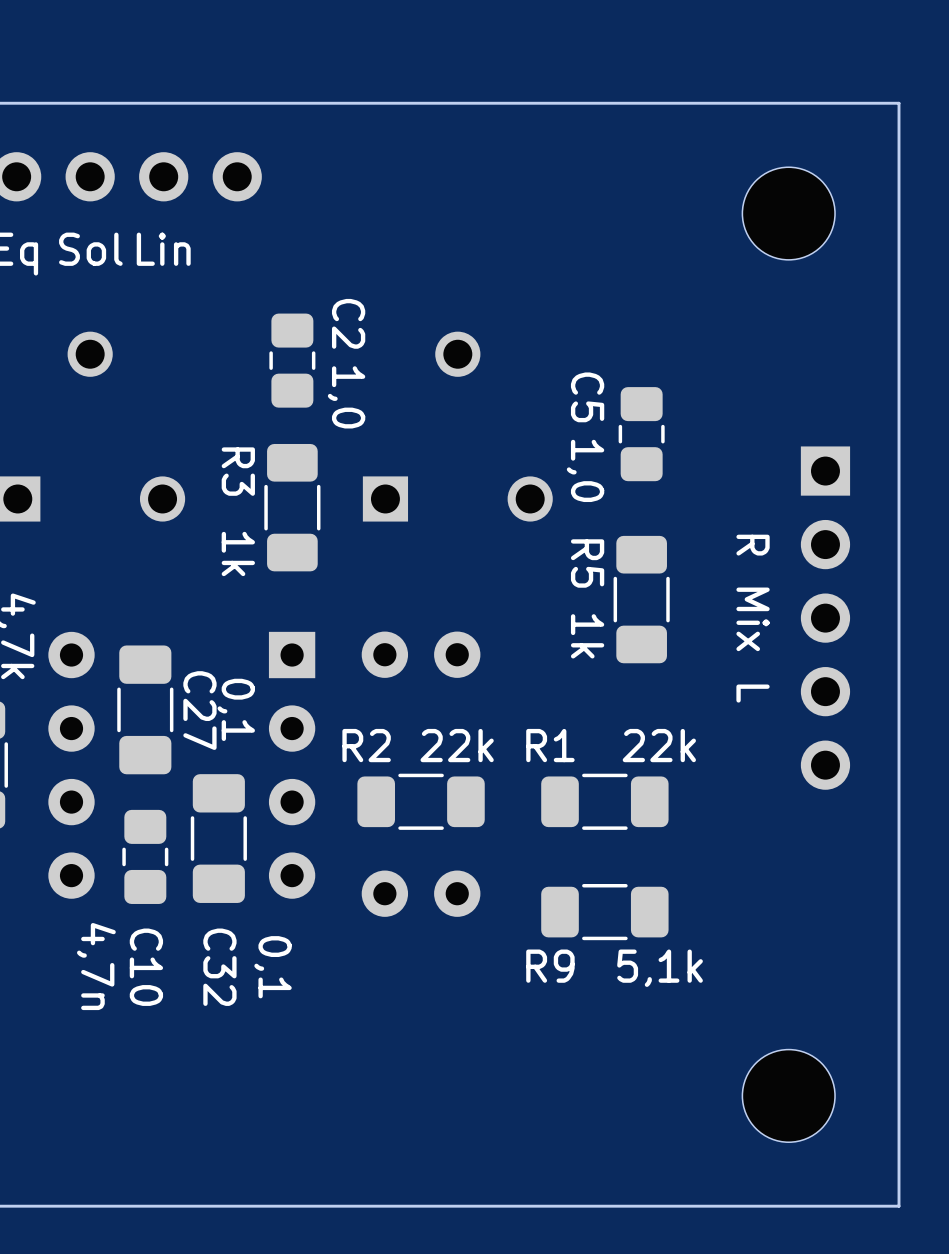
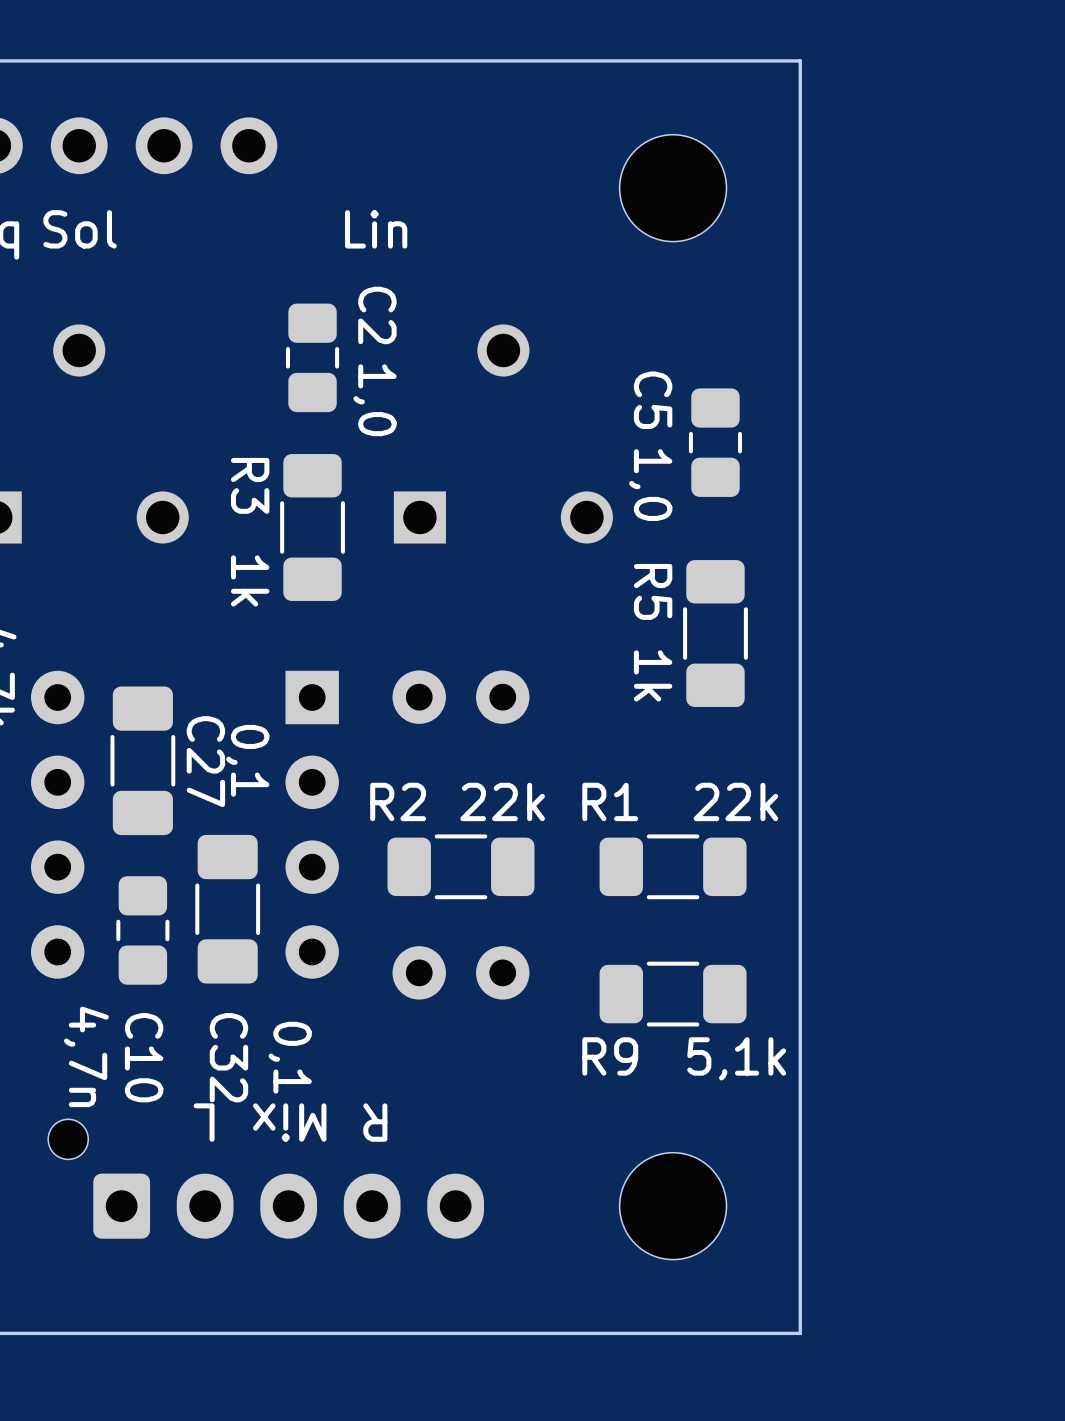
board edge: (715, 103) (899, 103) (899, 1206) (715, 1206) -> (800, 60) (800, 1333)
part position: (788, 213) -> (673, 188)
text position: Lin (163, 249) -> Lin (376, 229)
text rotation: 0° (753, 545) -> 90° clockwise (375, 1122)
text position: R (753, 545) -> R (375, 1122)
part: (825, 618) -> none
text rotation: 0° (753, 619) -> 90° clockwise (289, 1122)
text position: Mix (753, 619) -> Mix (289, 1122)
text rotation: 0° (753, 693) -> 90° clockwise (204, 1122)
text position: L (753, 693) -> L (204, 1122)
part: none -> (266, 1179)
part position: (788, 1095) -> (673, 1206)

